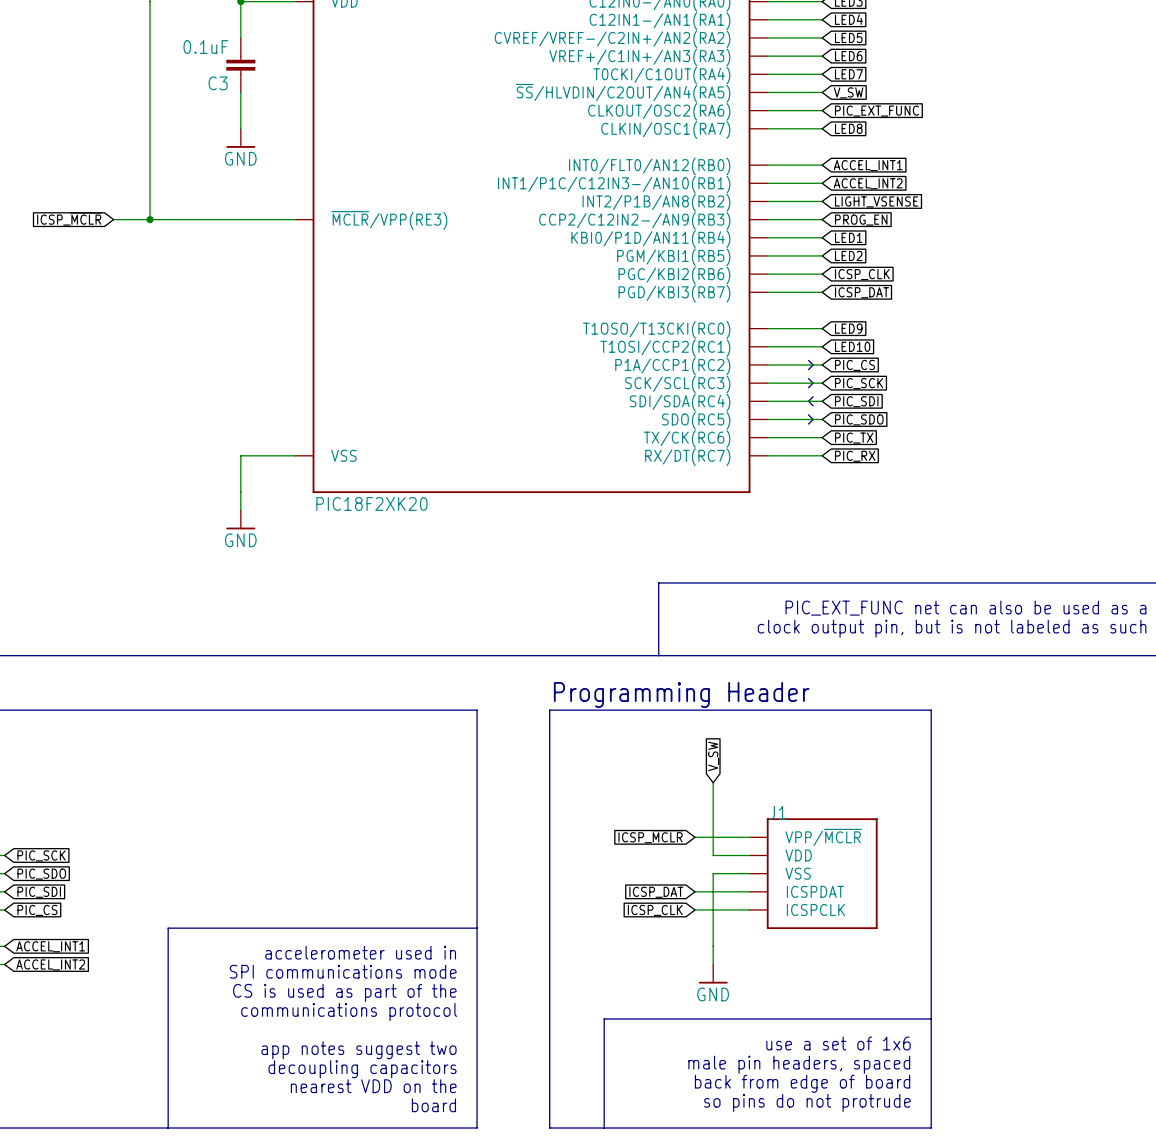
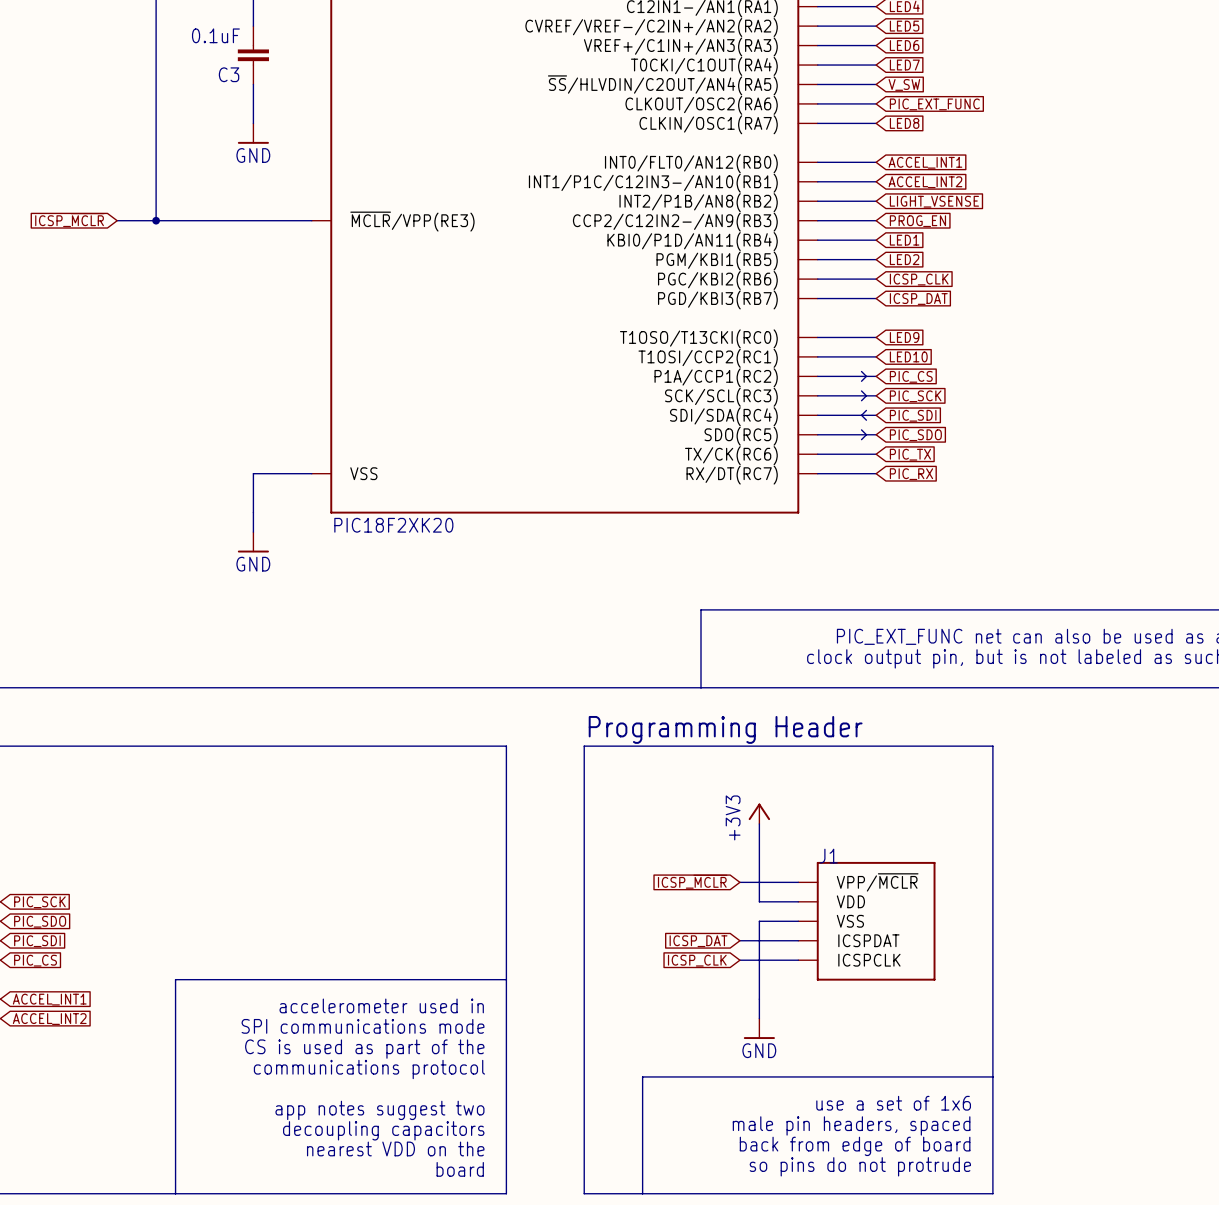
global label: V_SW (713, 756) -> none
power symbol: none -> +3V3 (759, 813)

